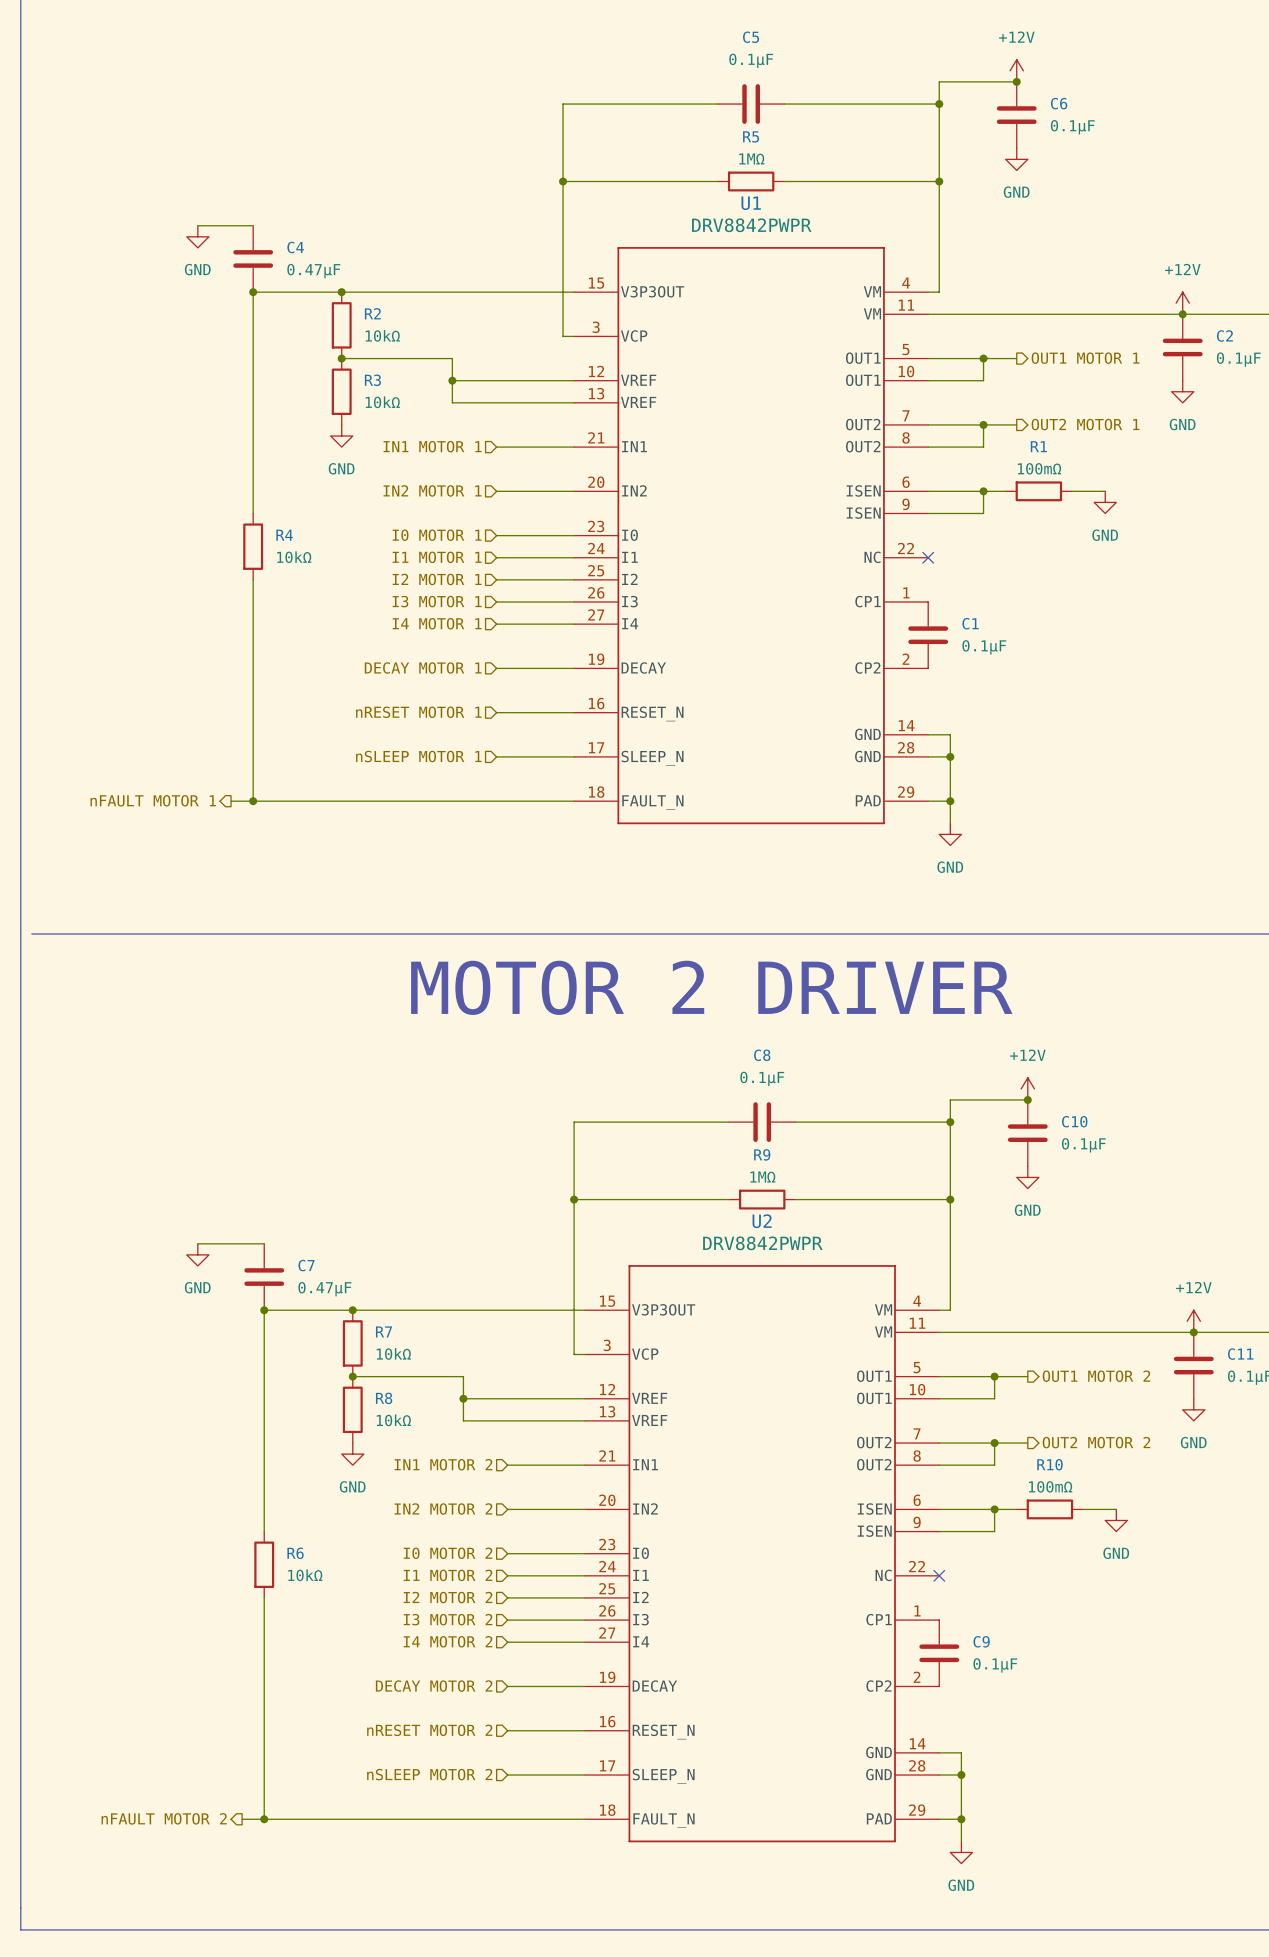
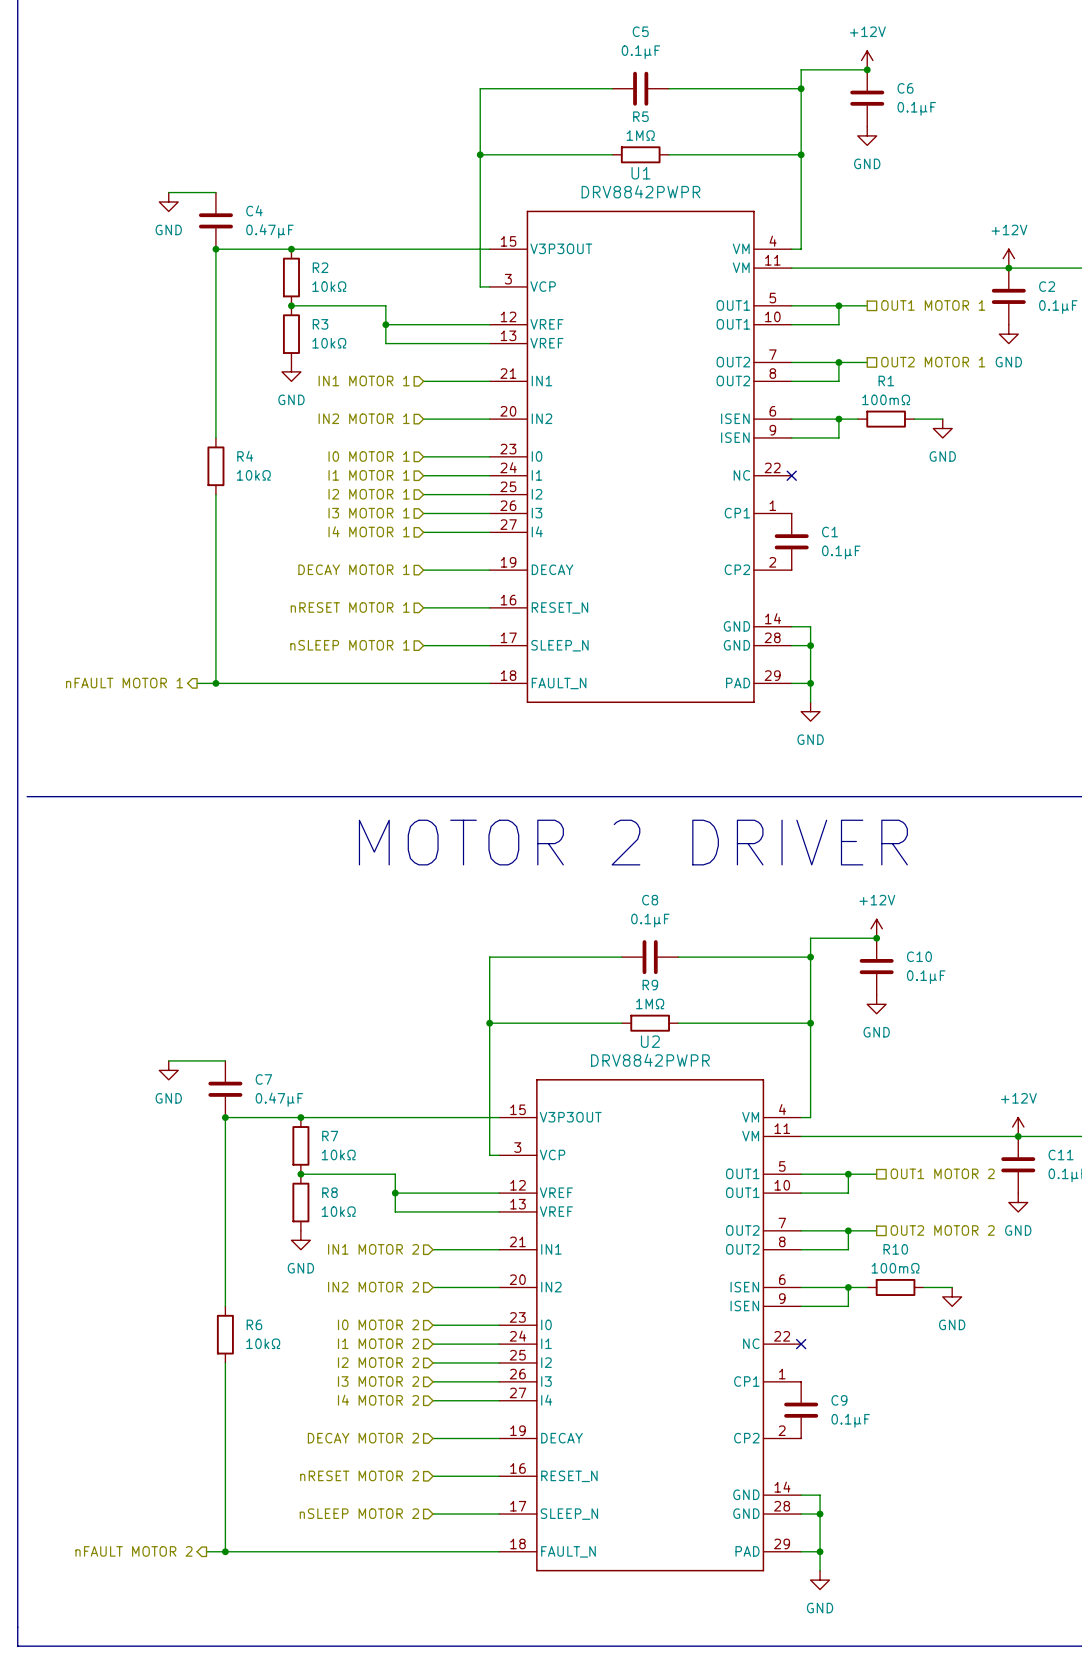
hierarchical label shape: output (1085, 358) -> passive (933, 305)
hierarchical label shape: output (1085, 424) -> passive (933, 362)
hierarchical label shape: output (1096, 1376) -> passive (942, 1173)
hierarchical label shape: output (1096, 1442) -> passive (942, 1230)

